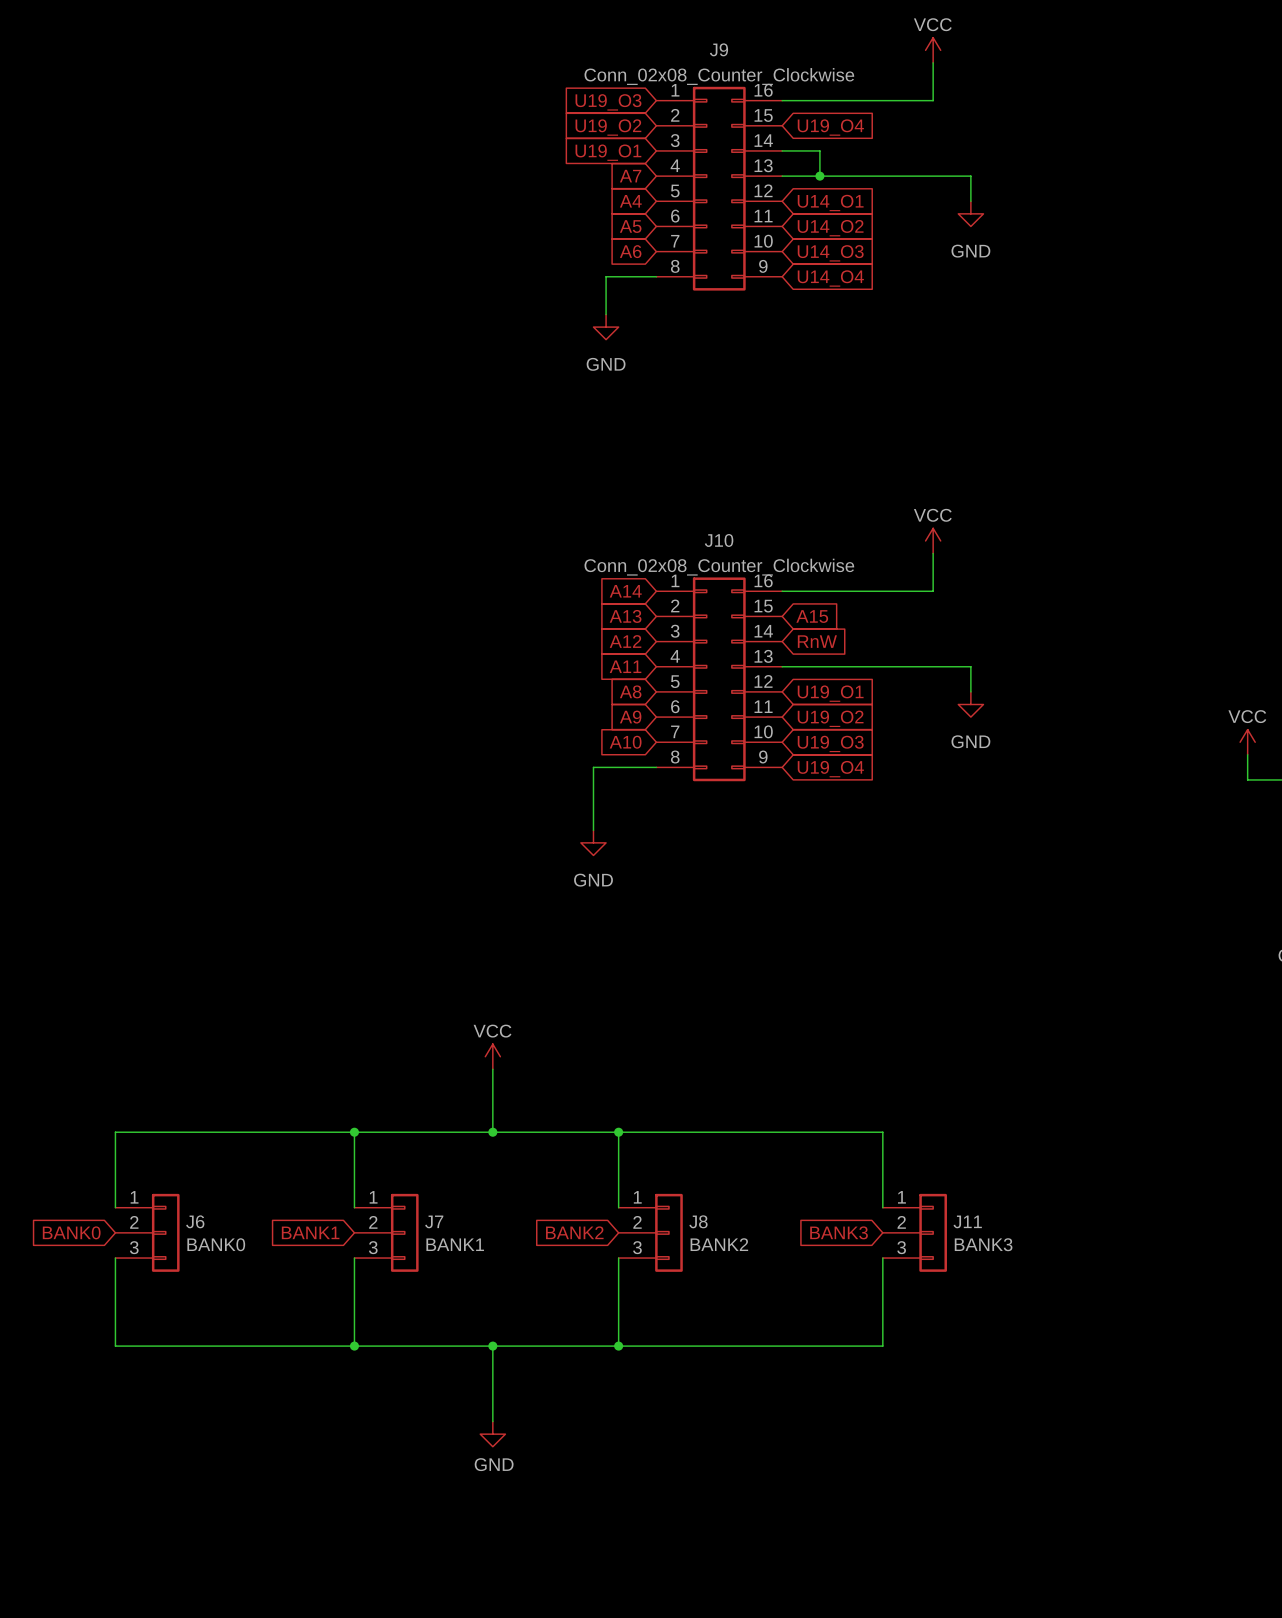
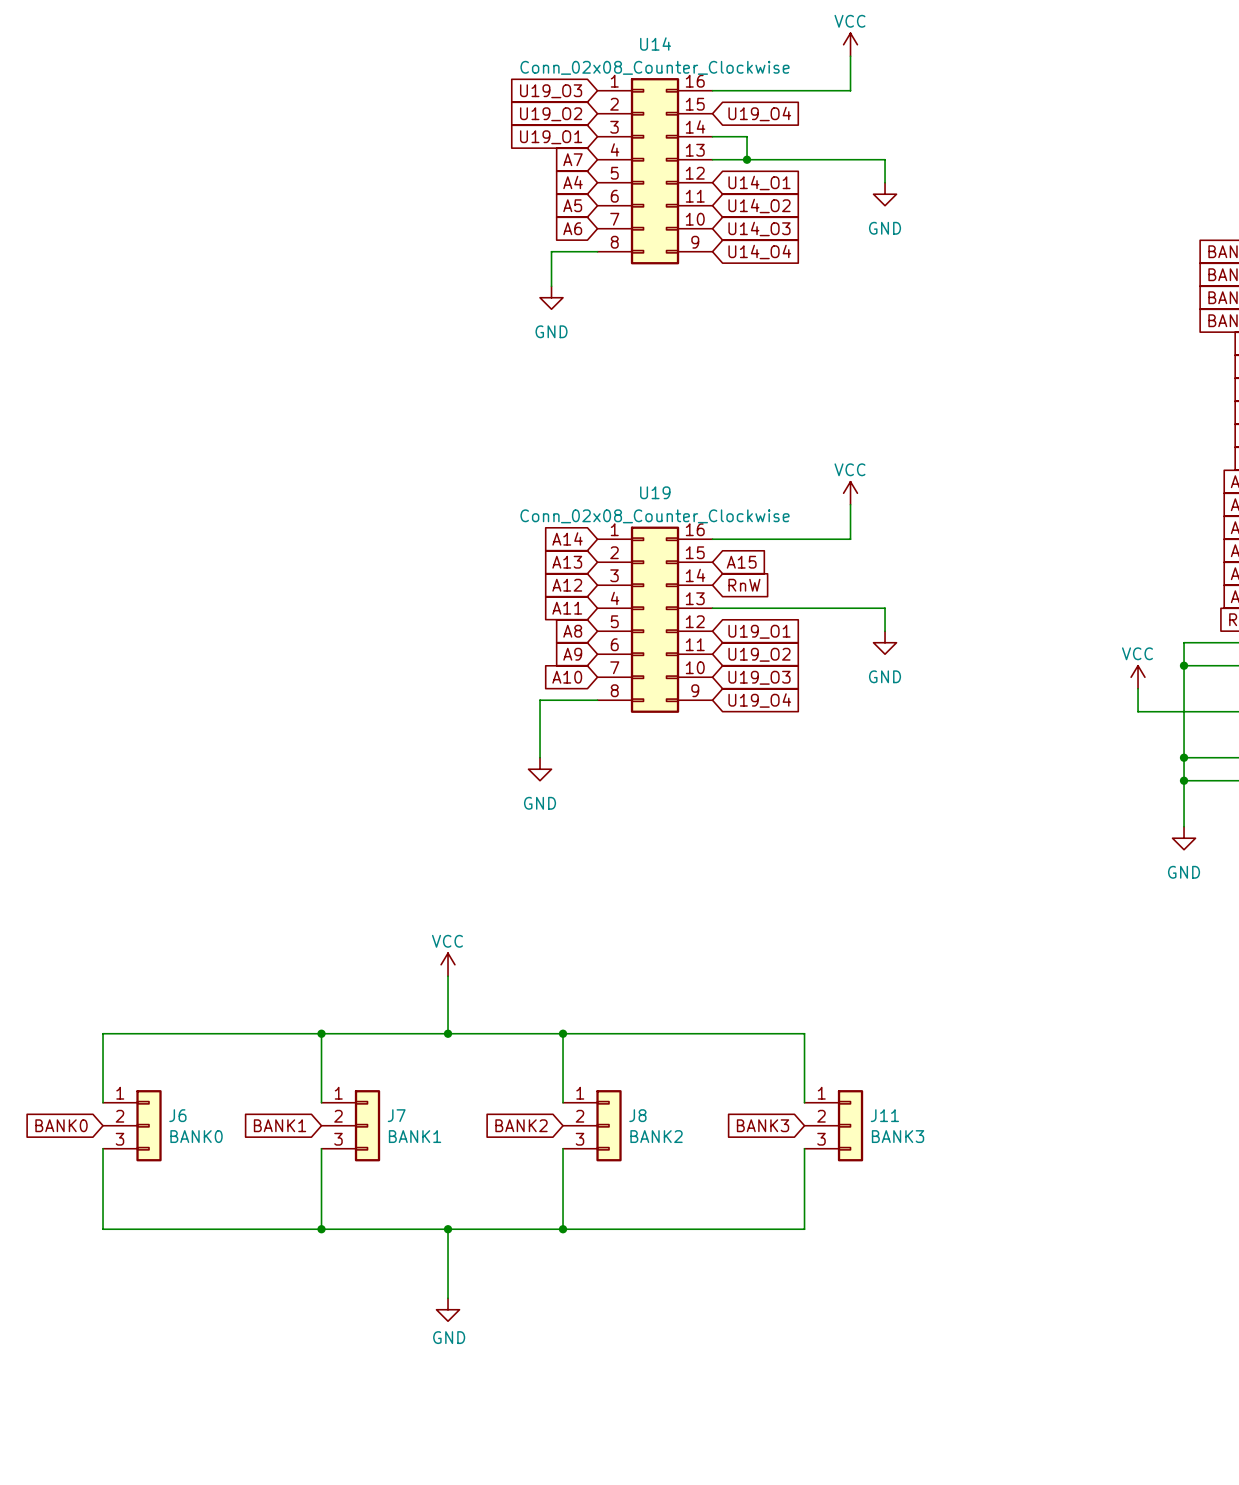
J9 name: J9 (718, 49) -> U14 (655, 44)
J10 name: J10 (719, 540) -> U19 (655, 492)

